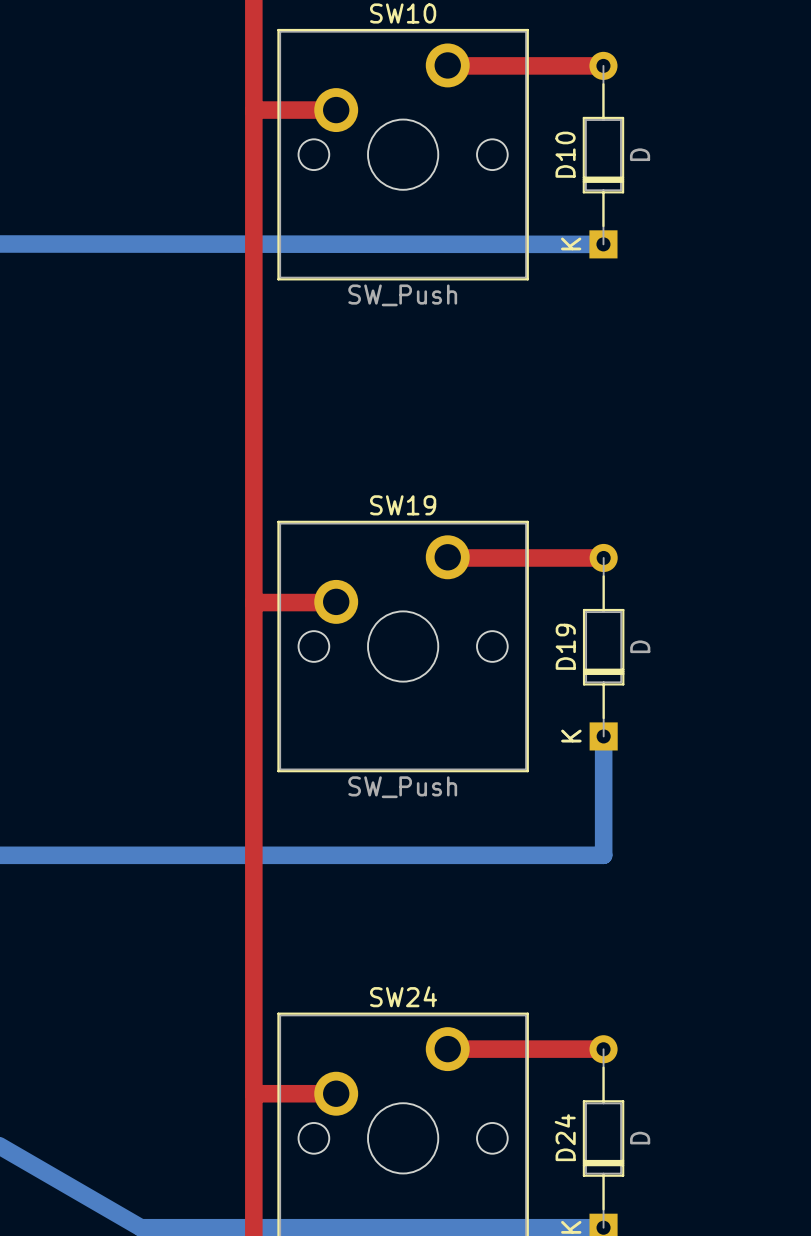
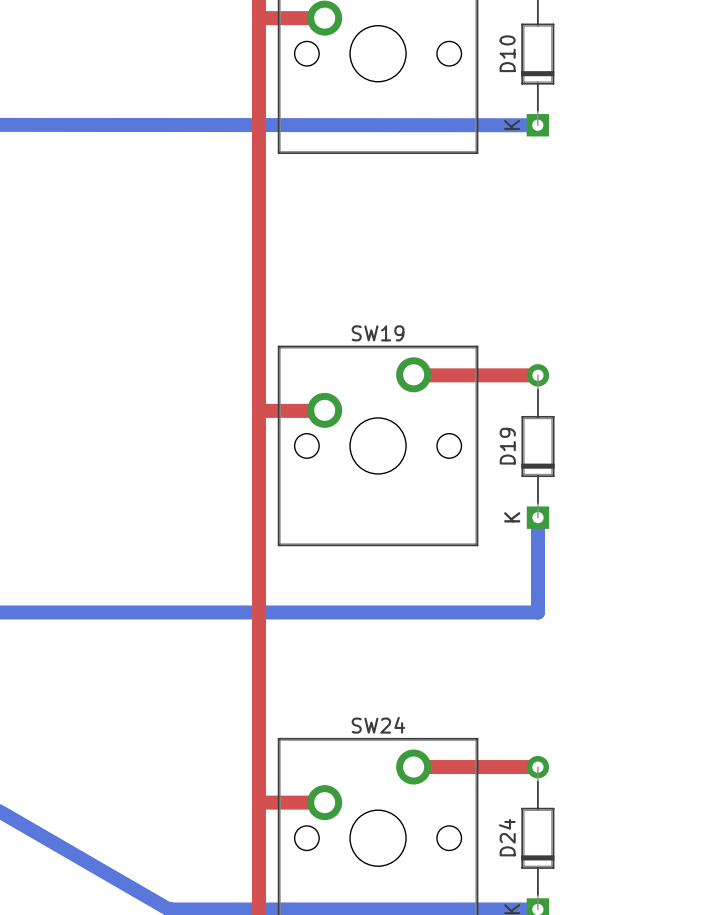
D10 value: D (640, 154) -> none
SW10 value: SW_Push (402, 295) -> none
D19 value: D (640, 646) -> none
SW19 value: SW_Push (402, 787) -> none
D24 value: D (640, 1138) -> none

